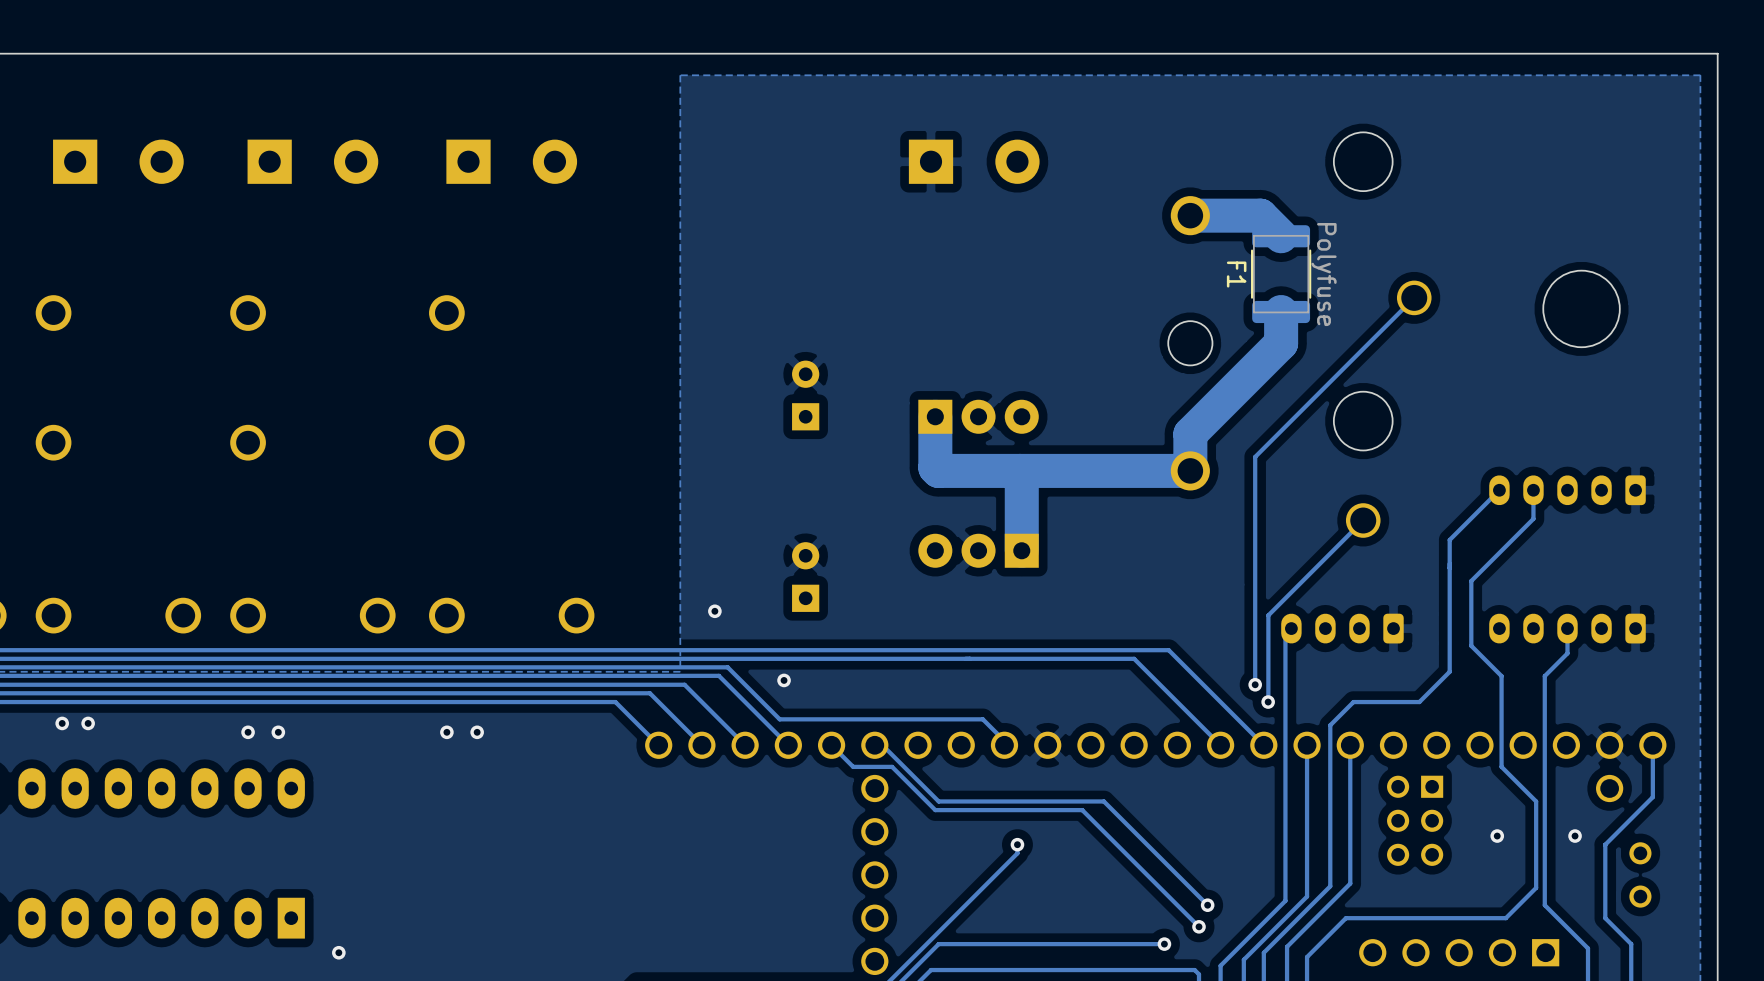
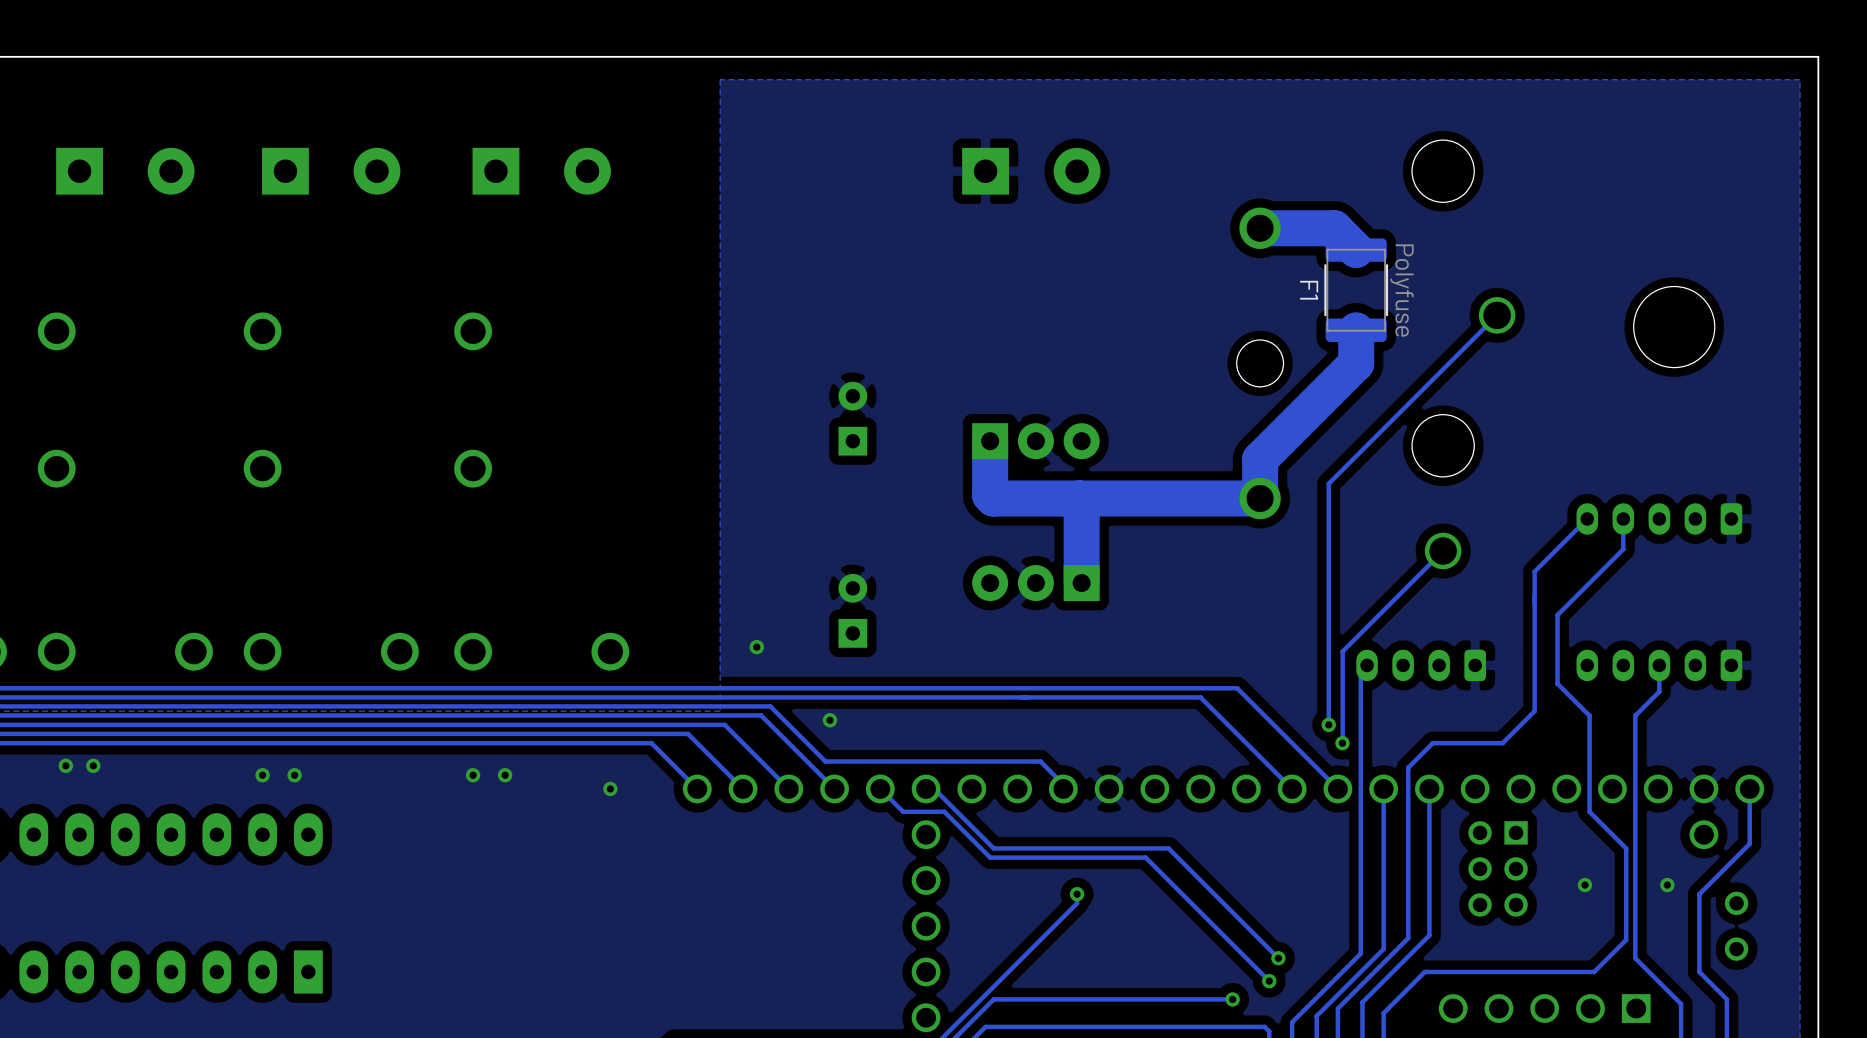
via: none -> (610, 788)
via: (338, 952) -> none

